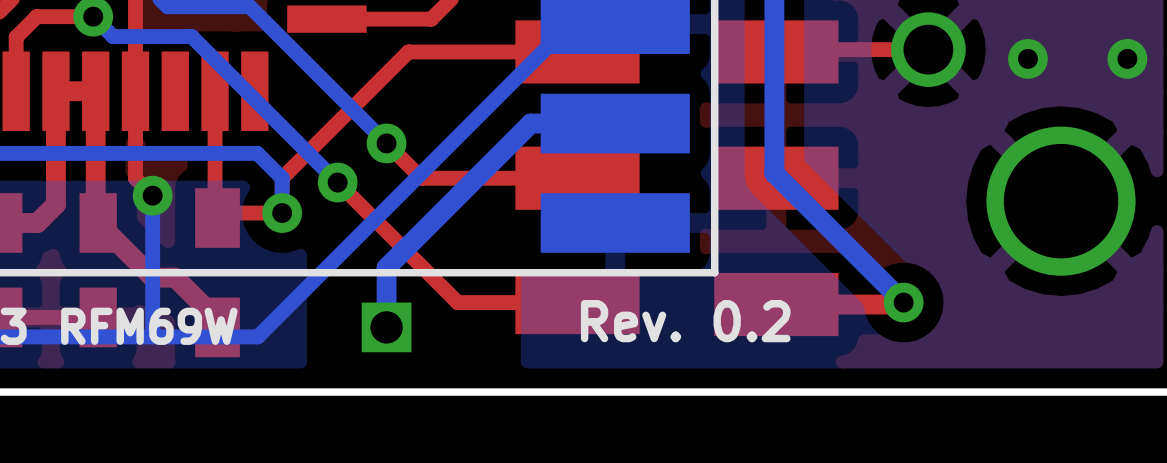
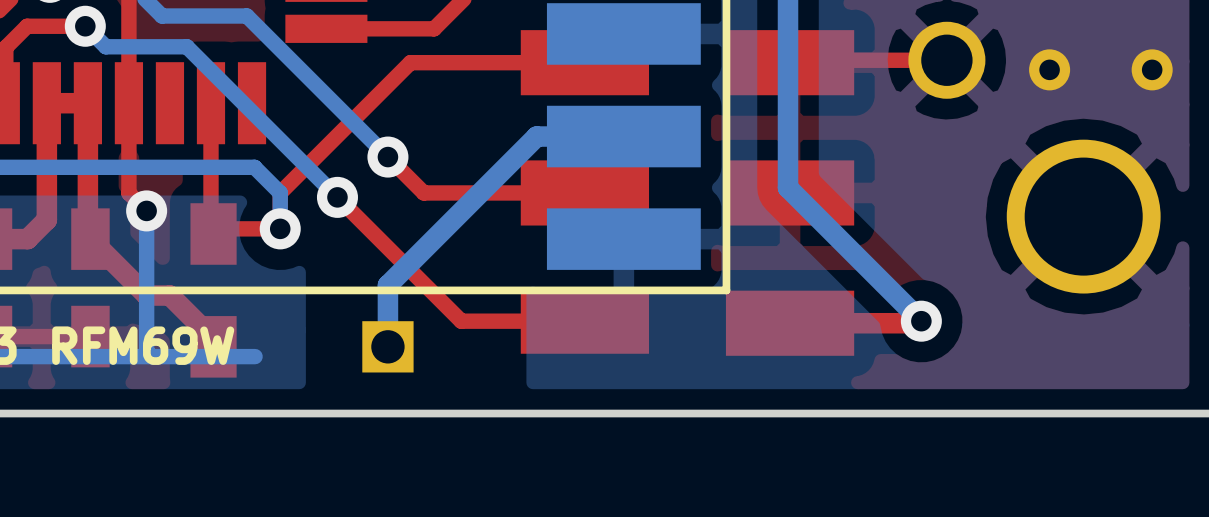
bottom track: (570, 24) (257, 336) -> none
text: Rev. 0.2 (685, 321) -> none

